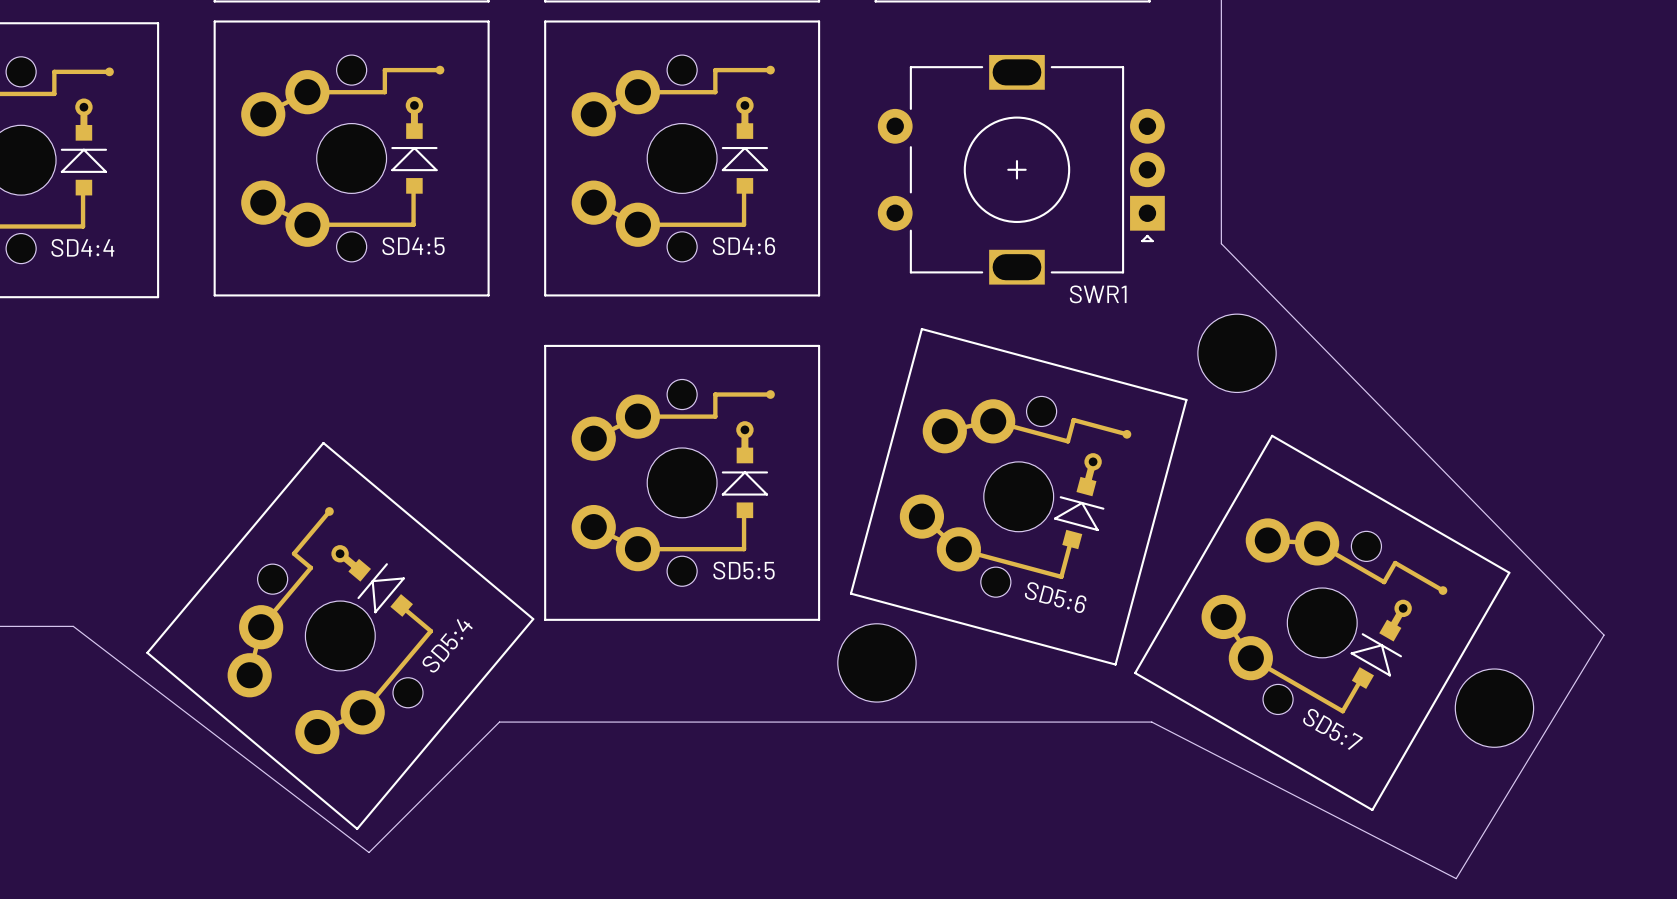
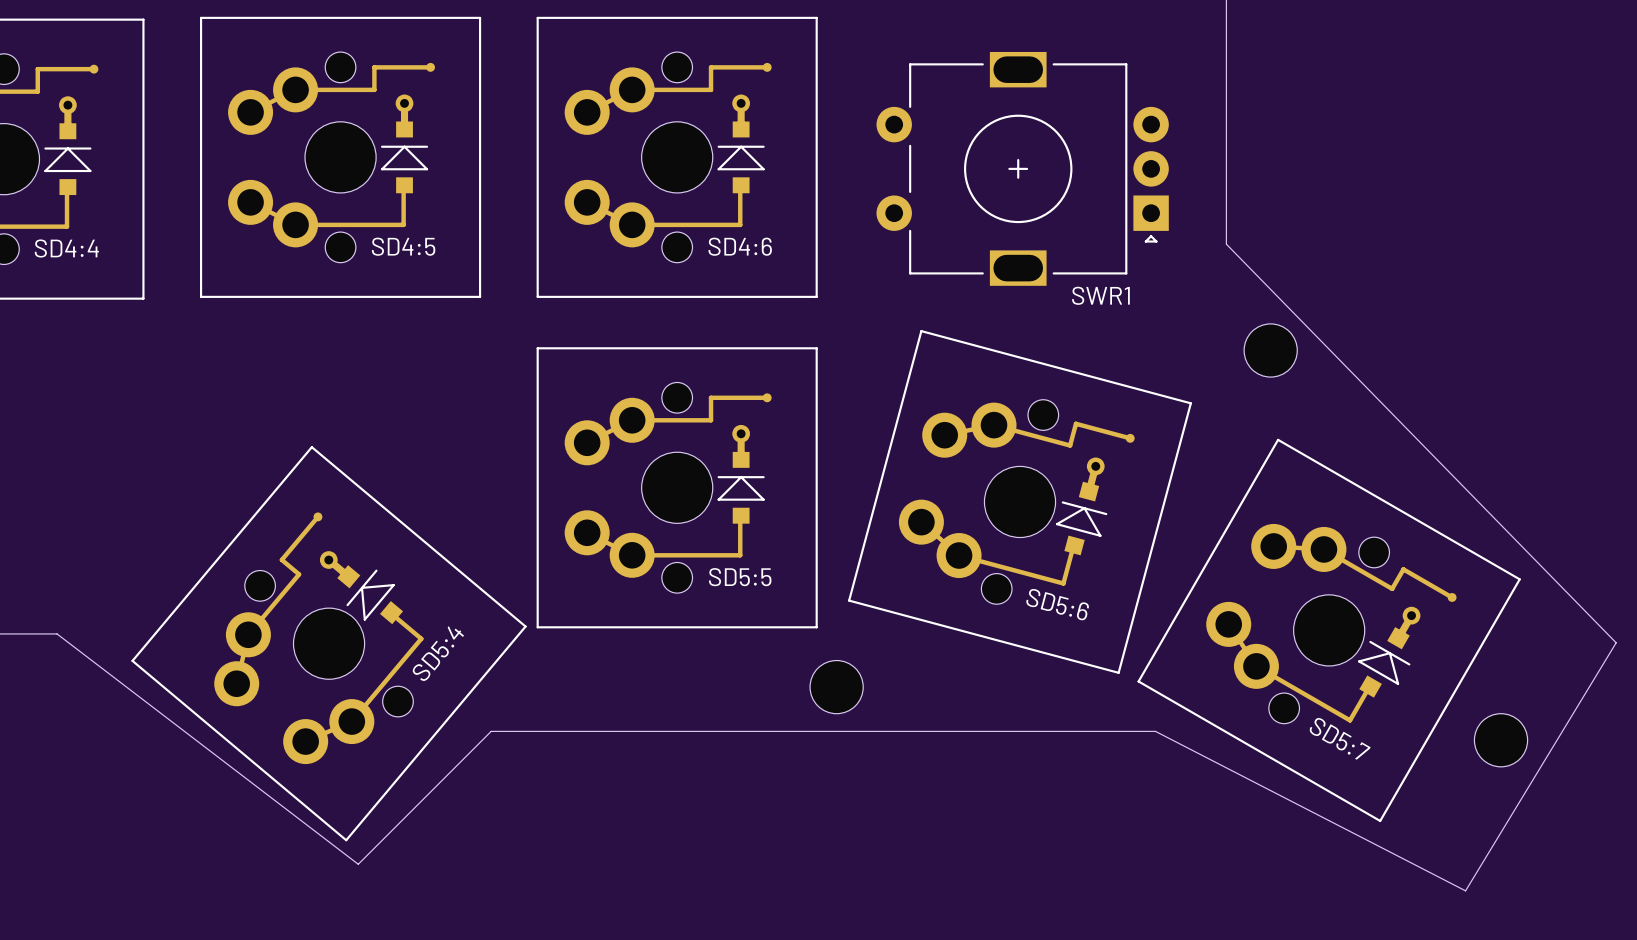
part: none -> (1270, 350)
part: (1237, 353) -> none
part: (876, 662) -> none
part: none -> (836, 687)
part: (1494, 708) -> none
part: none -> (1501, 740)

